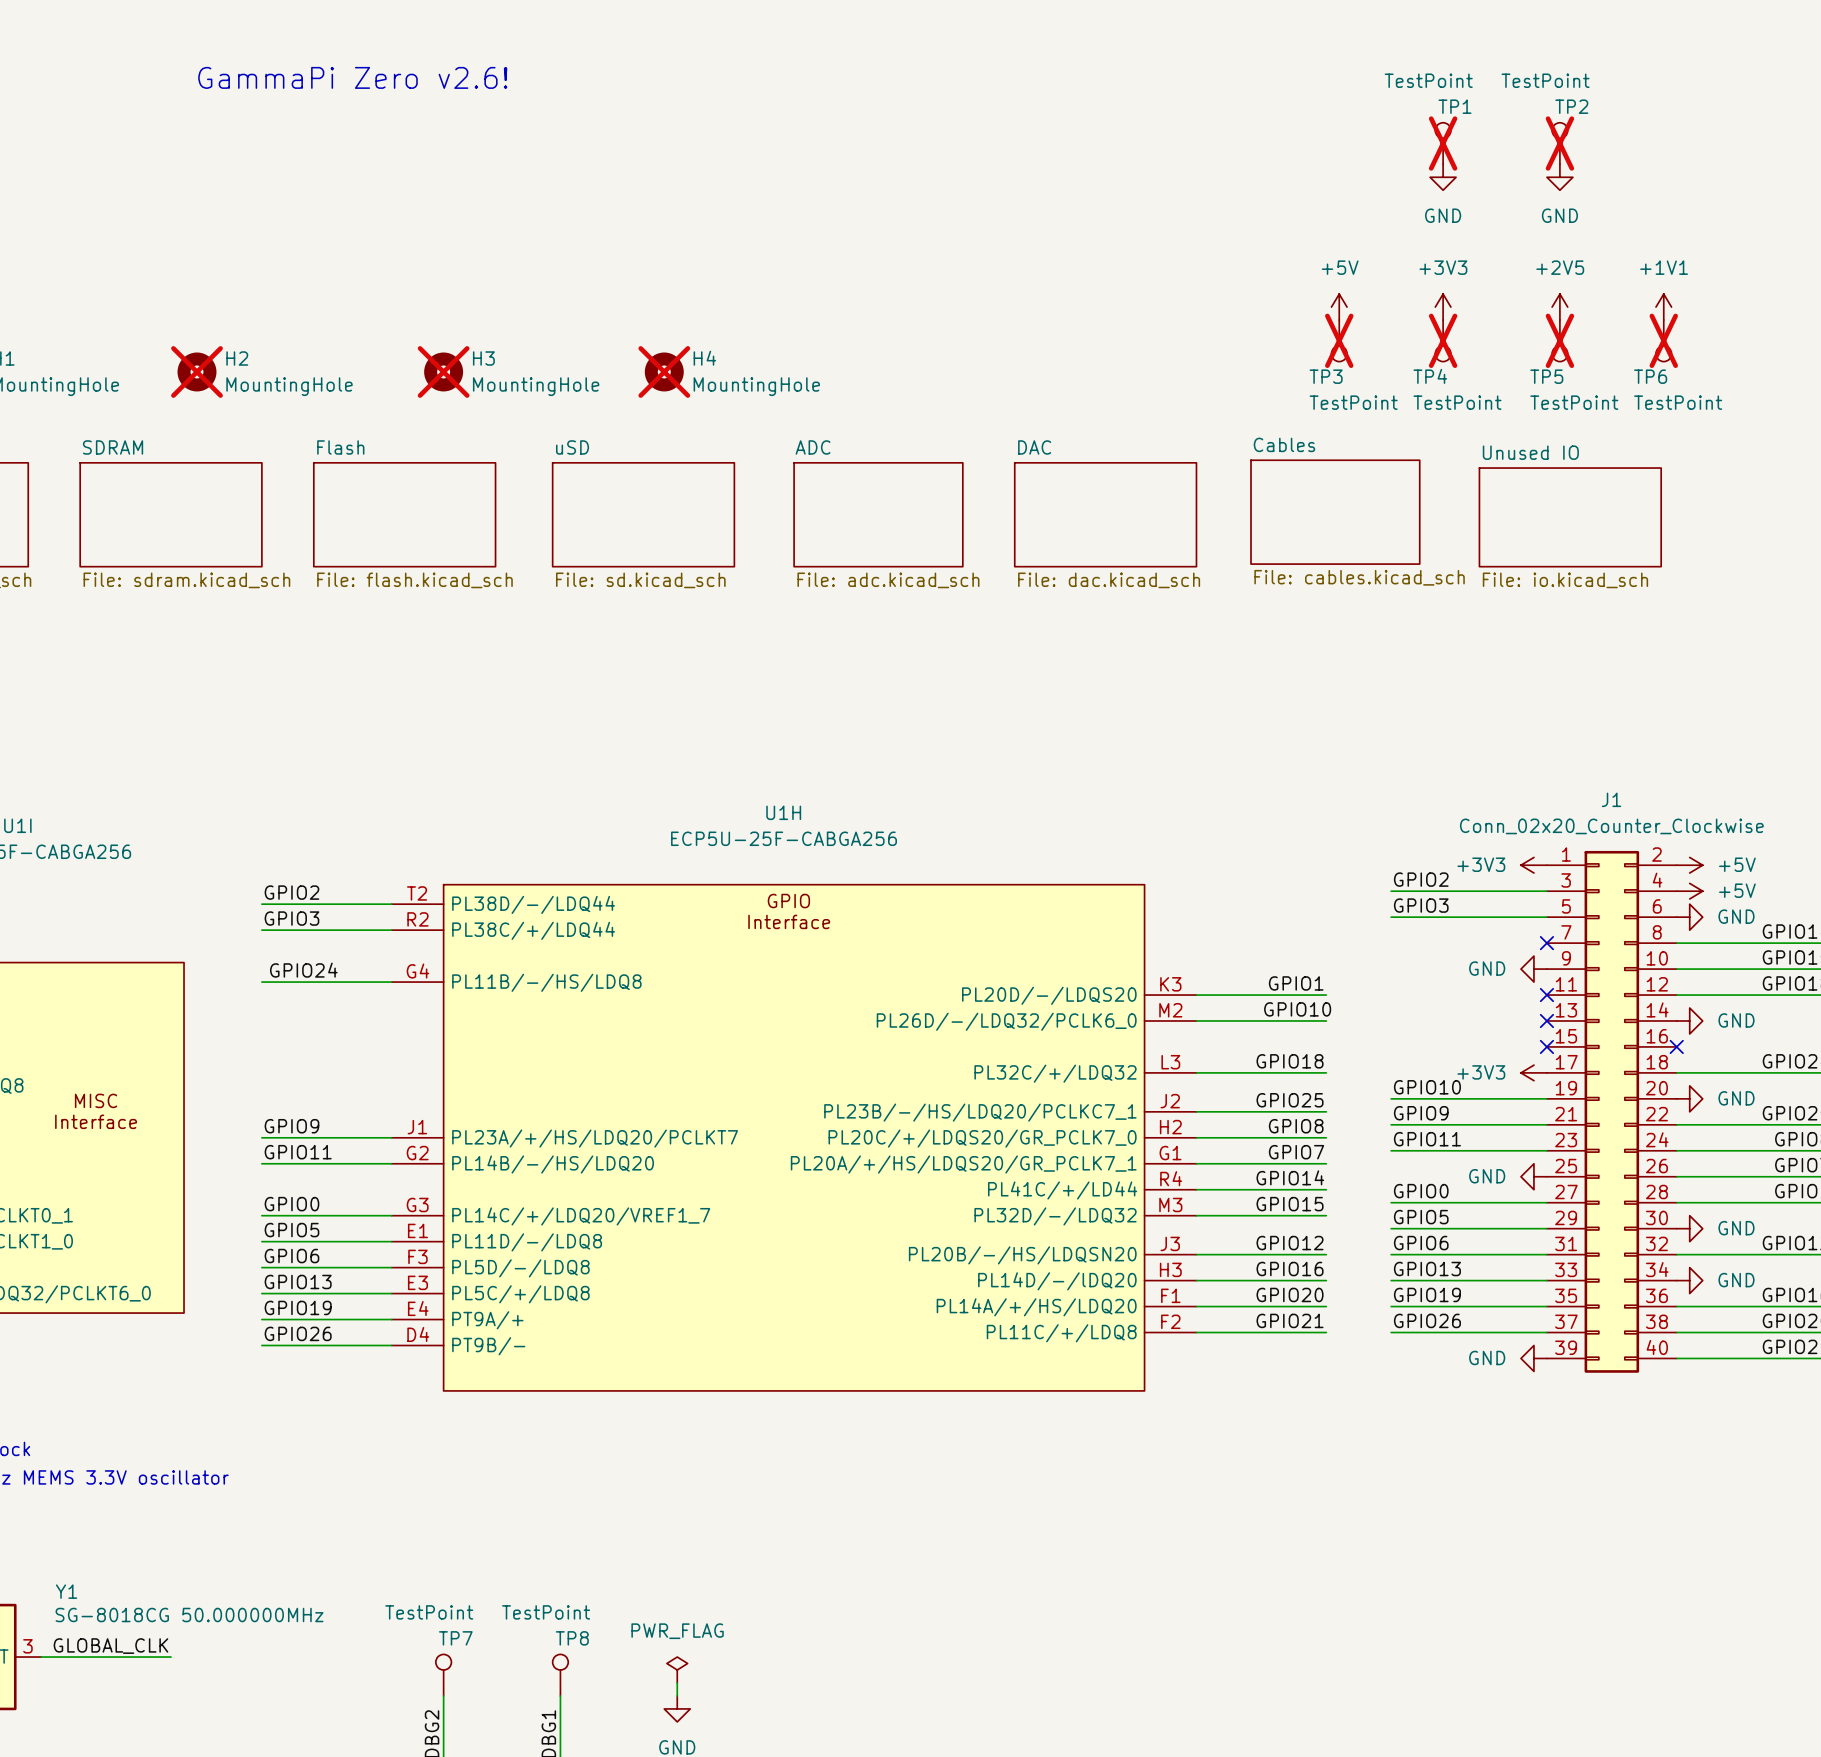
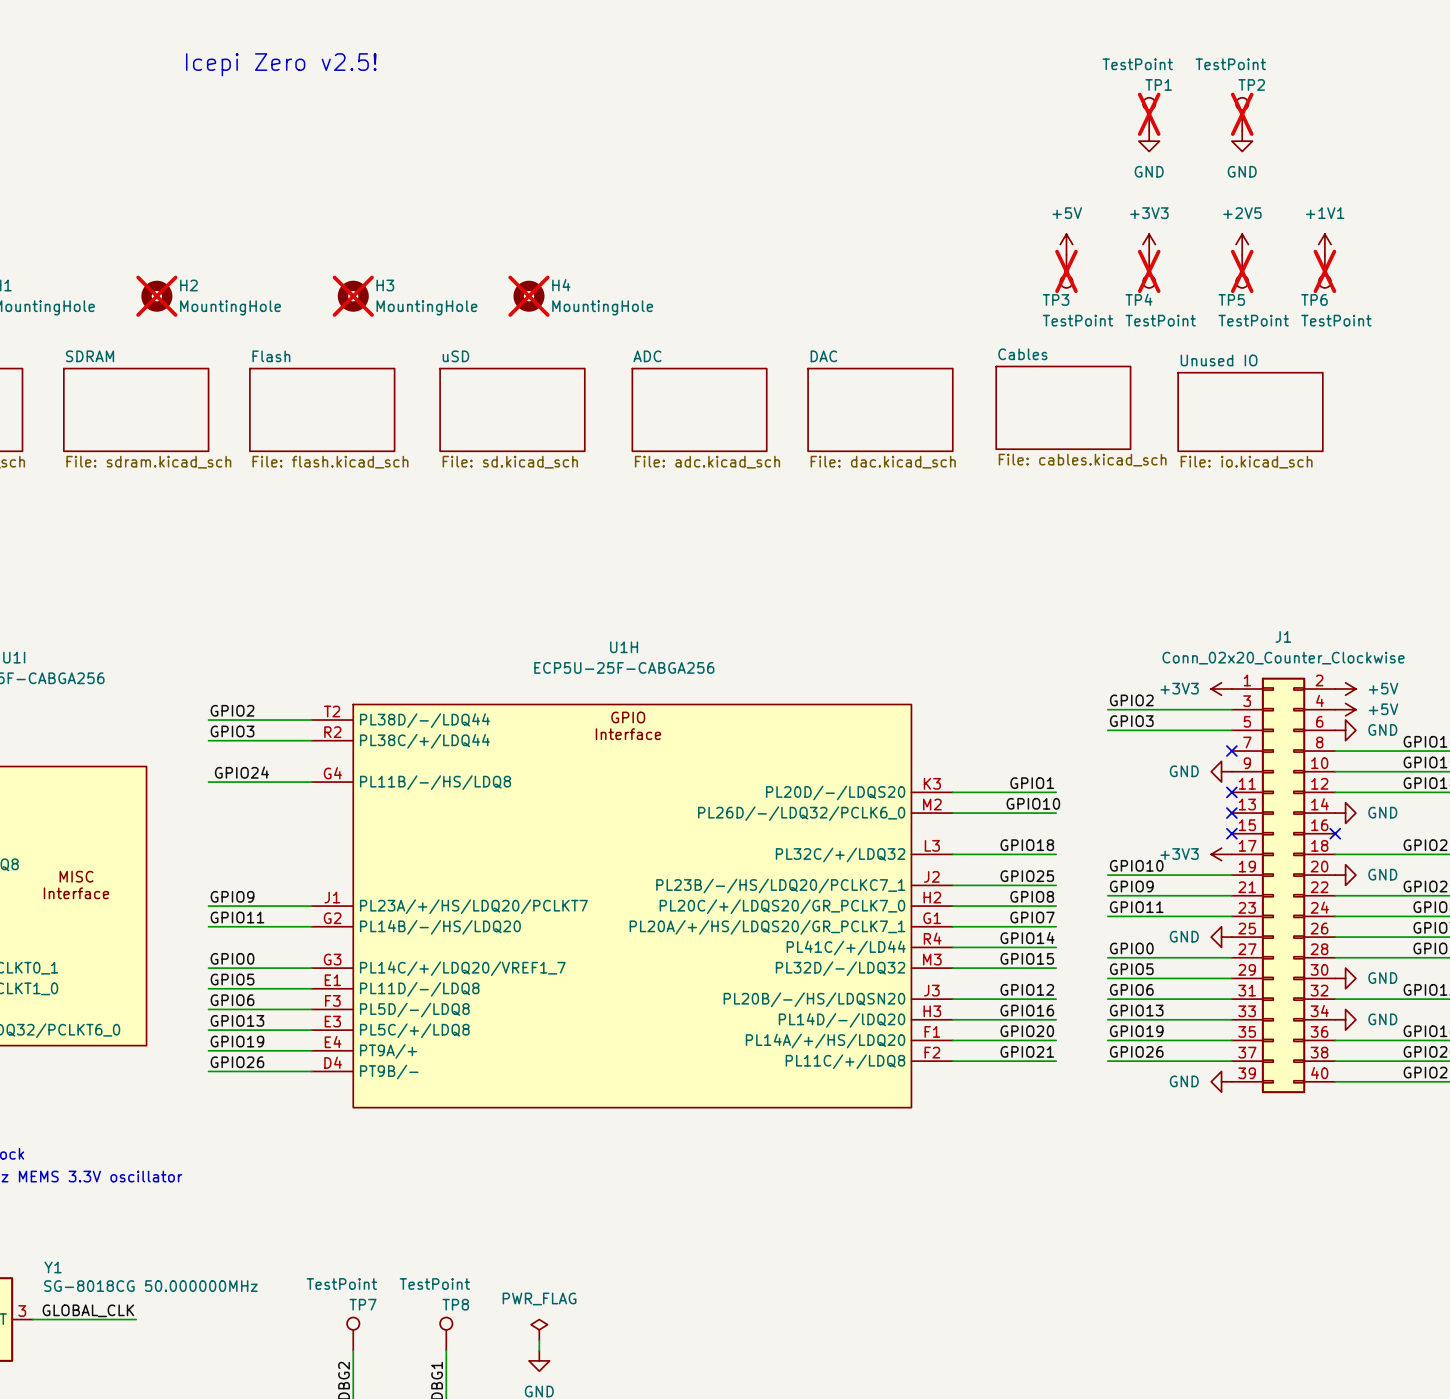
text: GammaPi Zero v2.6! (352, 77) -> Icepi Zero v2.5! (281, 64)

